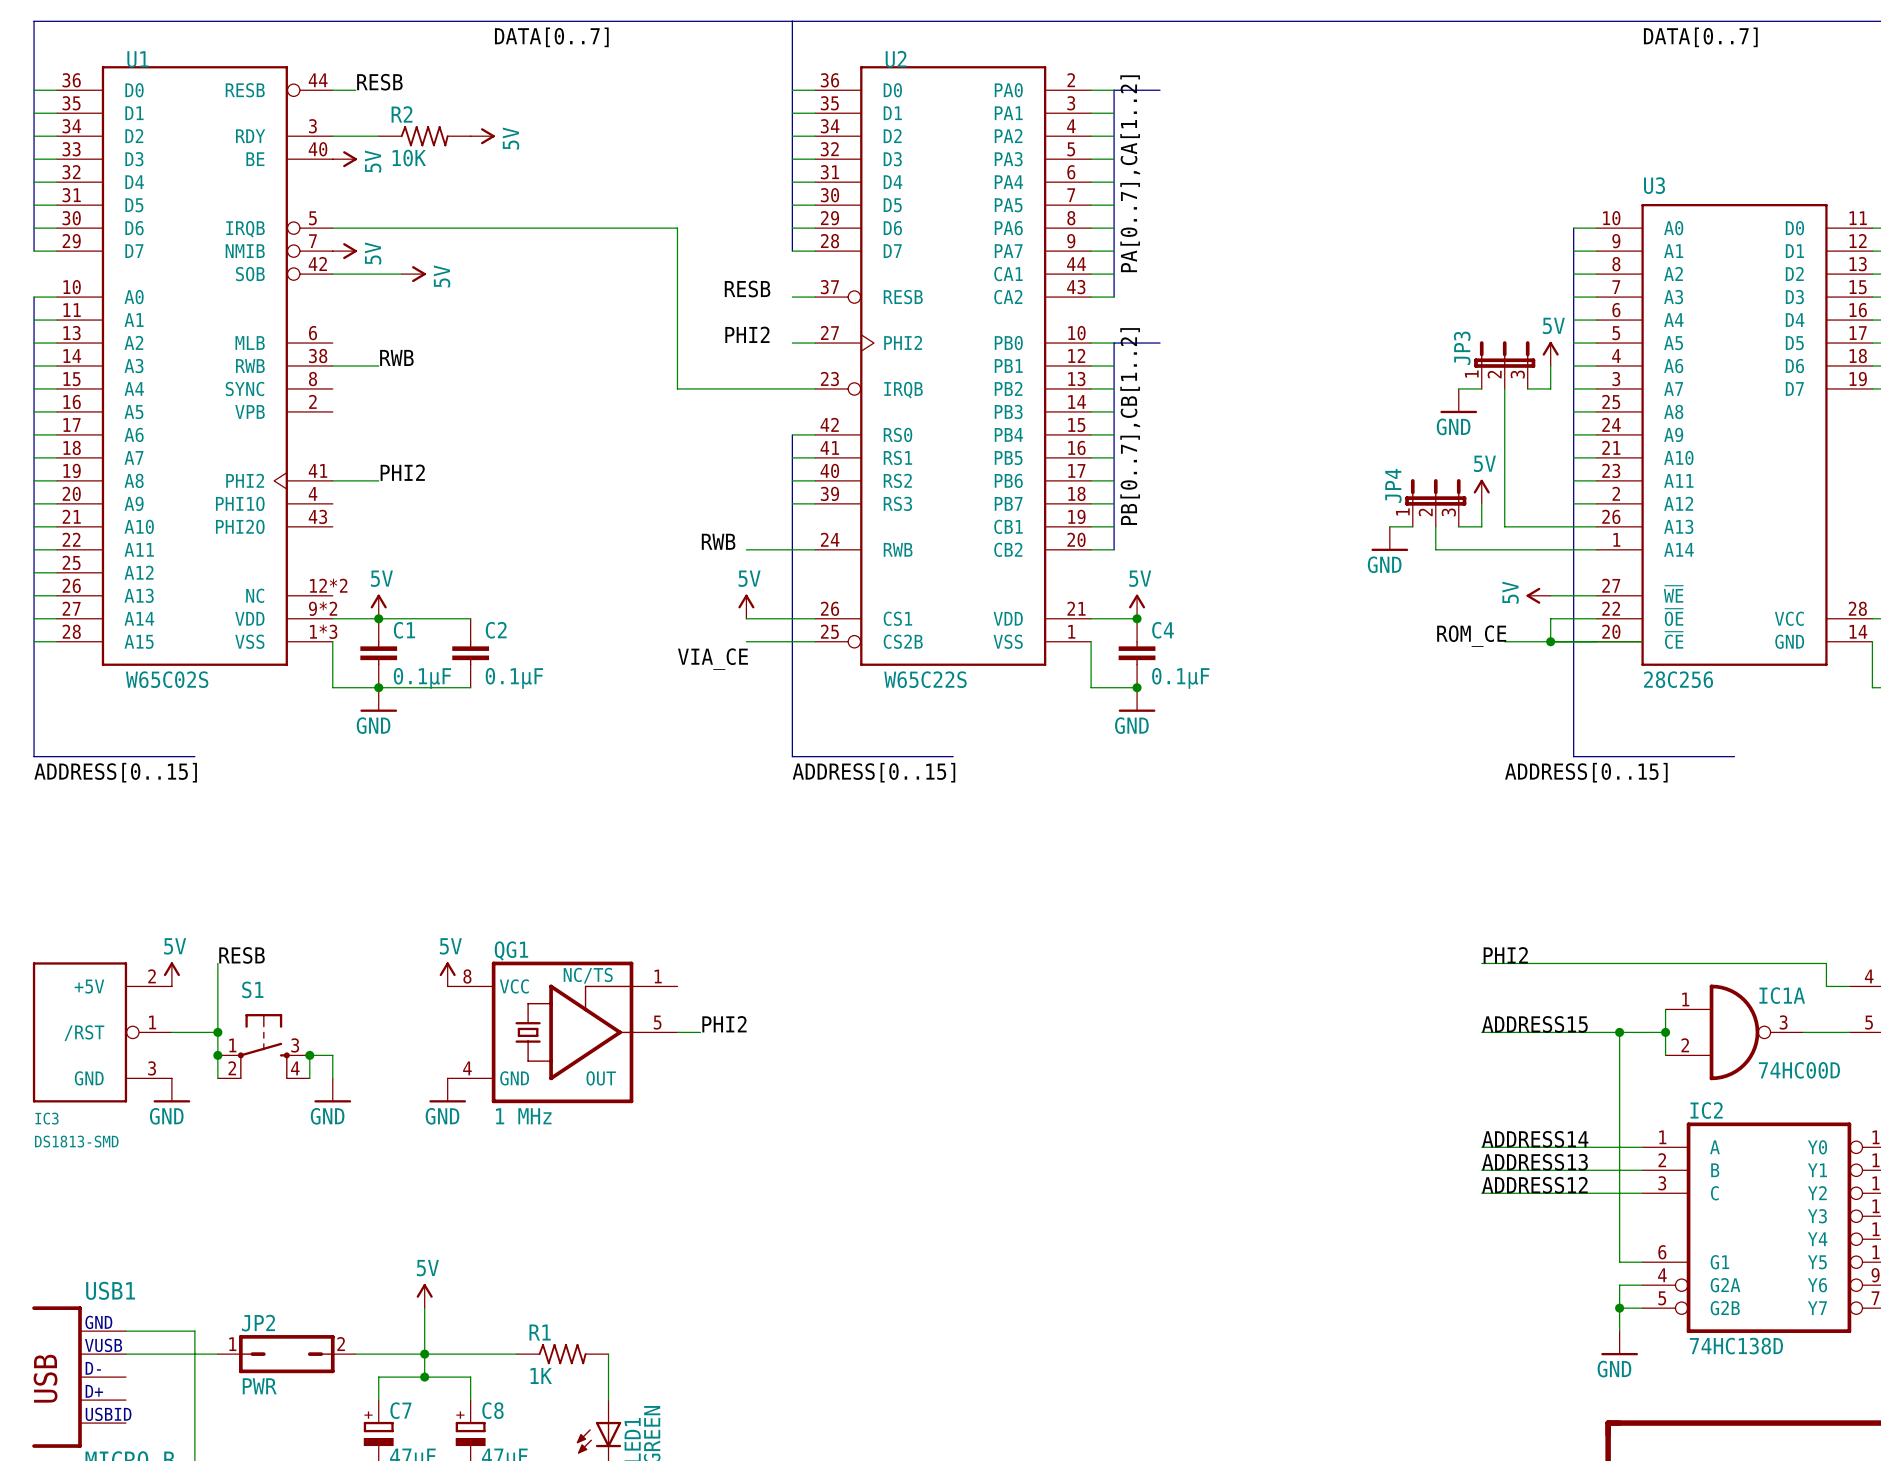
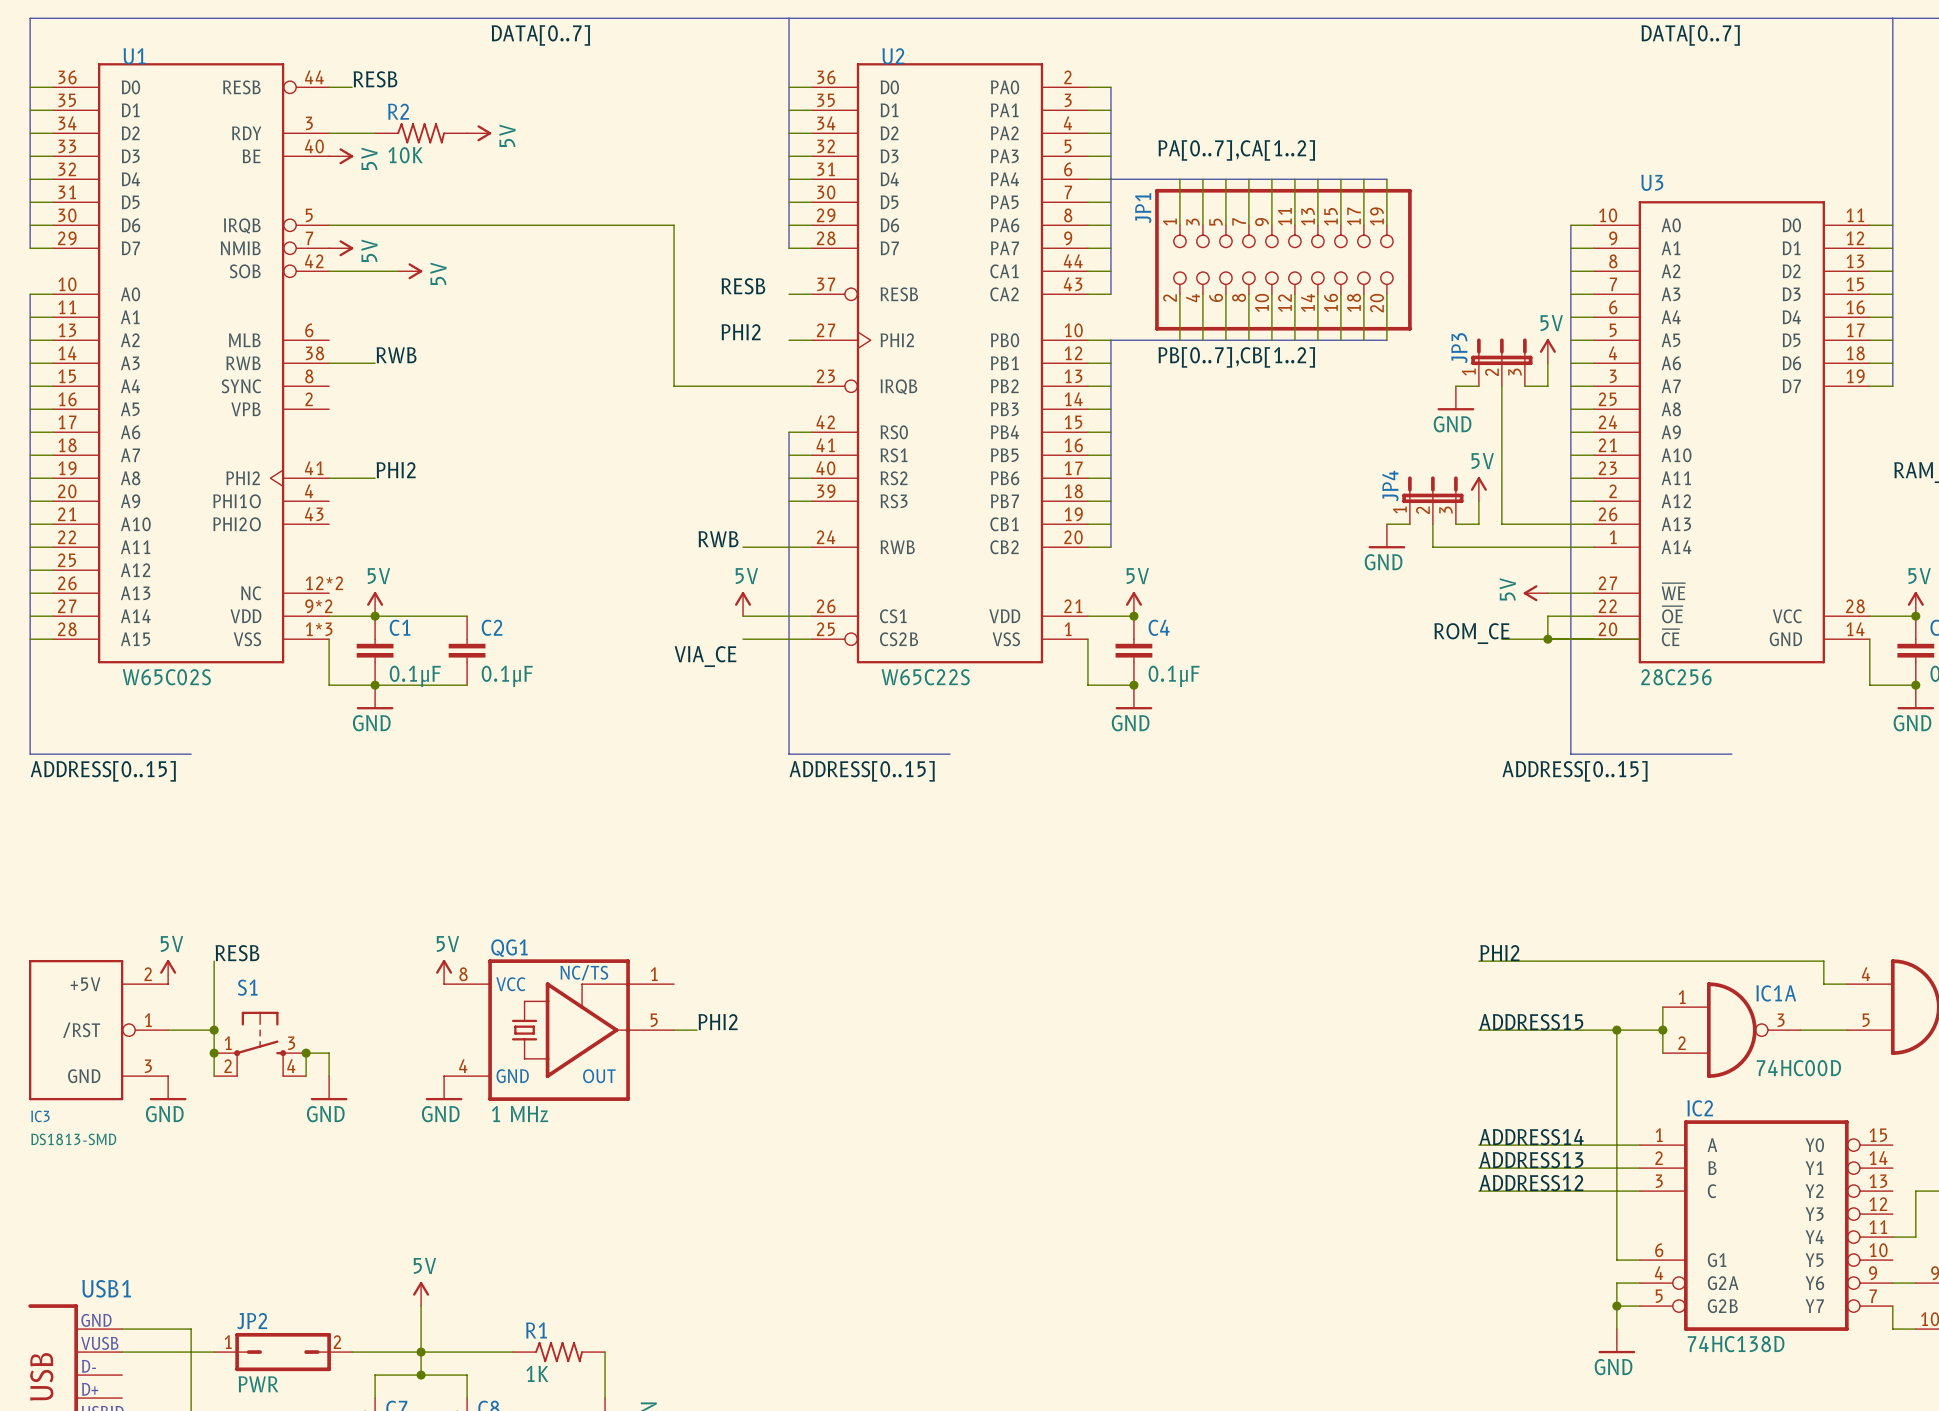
bus: (1114, 90) (1160, 90) -> none
label rotation: 0° (1130, 173) -> 90° clockwise (1236, 150)
bus: none -> (1110, 179) (1386, 179)
wire: none -> (1179, 179) (1179, 225)
wire: none -> (1202, 179) (1202, 225)
wire: none -> (1225, 179) (1225, 225)
wire: none -> (1248, 179) (1248, 225)
wire: none -> (1271, 179) (1271, 225)
wire: none -> (1294, 179) (1294, 225)
wire: none -> (1317, 179) (1317, 225)
wire: none -> (1340, 179) (1340, 225)
wire: none -> (1363, 179) (1363, 225)
wire: none -> (1386, 179) (1386, 225)
JP1: none -> (1283, 259)
wire: none -> (1179, 294) (1179, 340)
wire: none -> (1202, 294) (1202, 340)
wire: none -> (1225, 294) (1225, 340)
wire: none -> (1248, 294) (1248, 340)
wire: none -> (1271, 294) (1271, 340)
wire: none -> (1294, 294) (1294, 340)
wire: none -> (1317, 294) (1317, 340)
wire: none -> (1340, 294) (1340, 340)
wire: none -> (1363, 294) (1363, 340)
wire: none -> (1386, 294) (1386, 340)
bus: none -> (1156, 340) (1386, 340)
label rotation: 0° (1130, 426) -> 90° clockwise (1236, 357)

